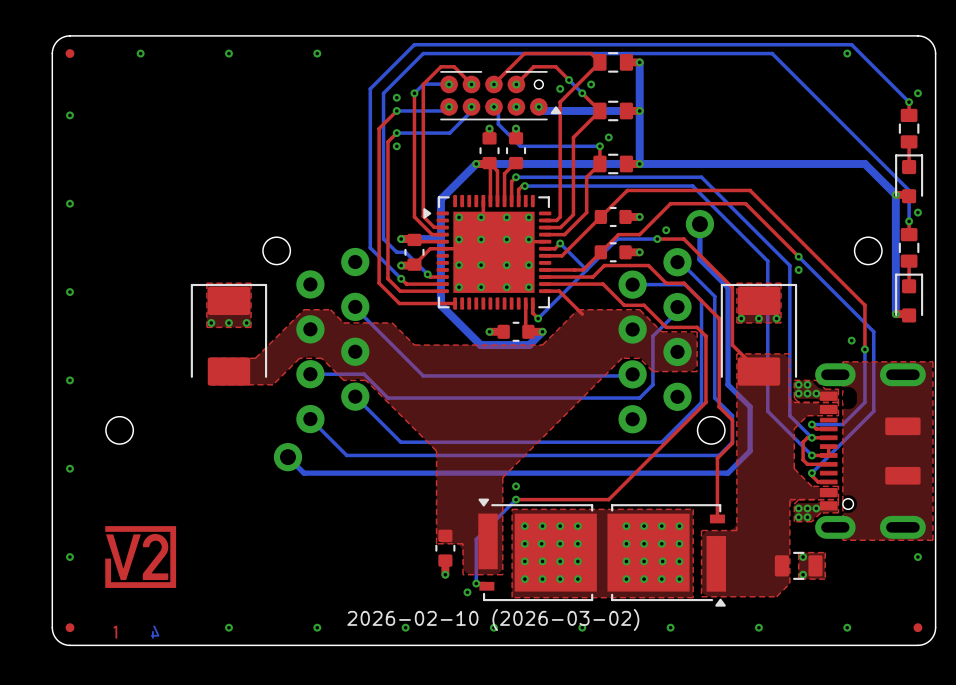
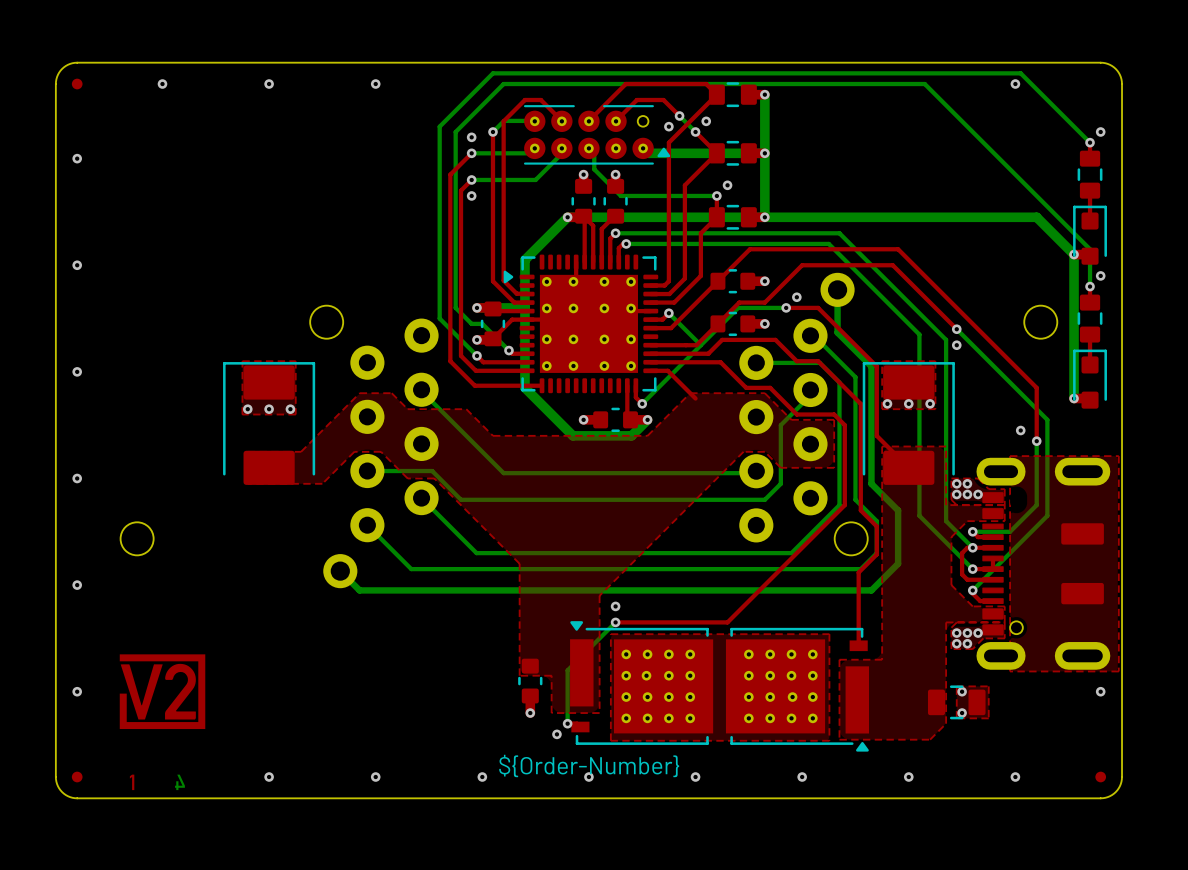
drawing shape: [347, 608, 640, 631] -> [499, 754, 680, 778]

